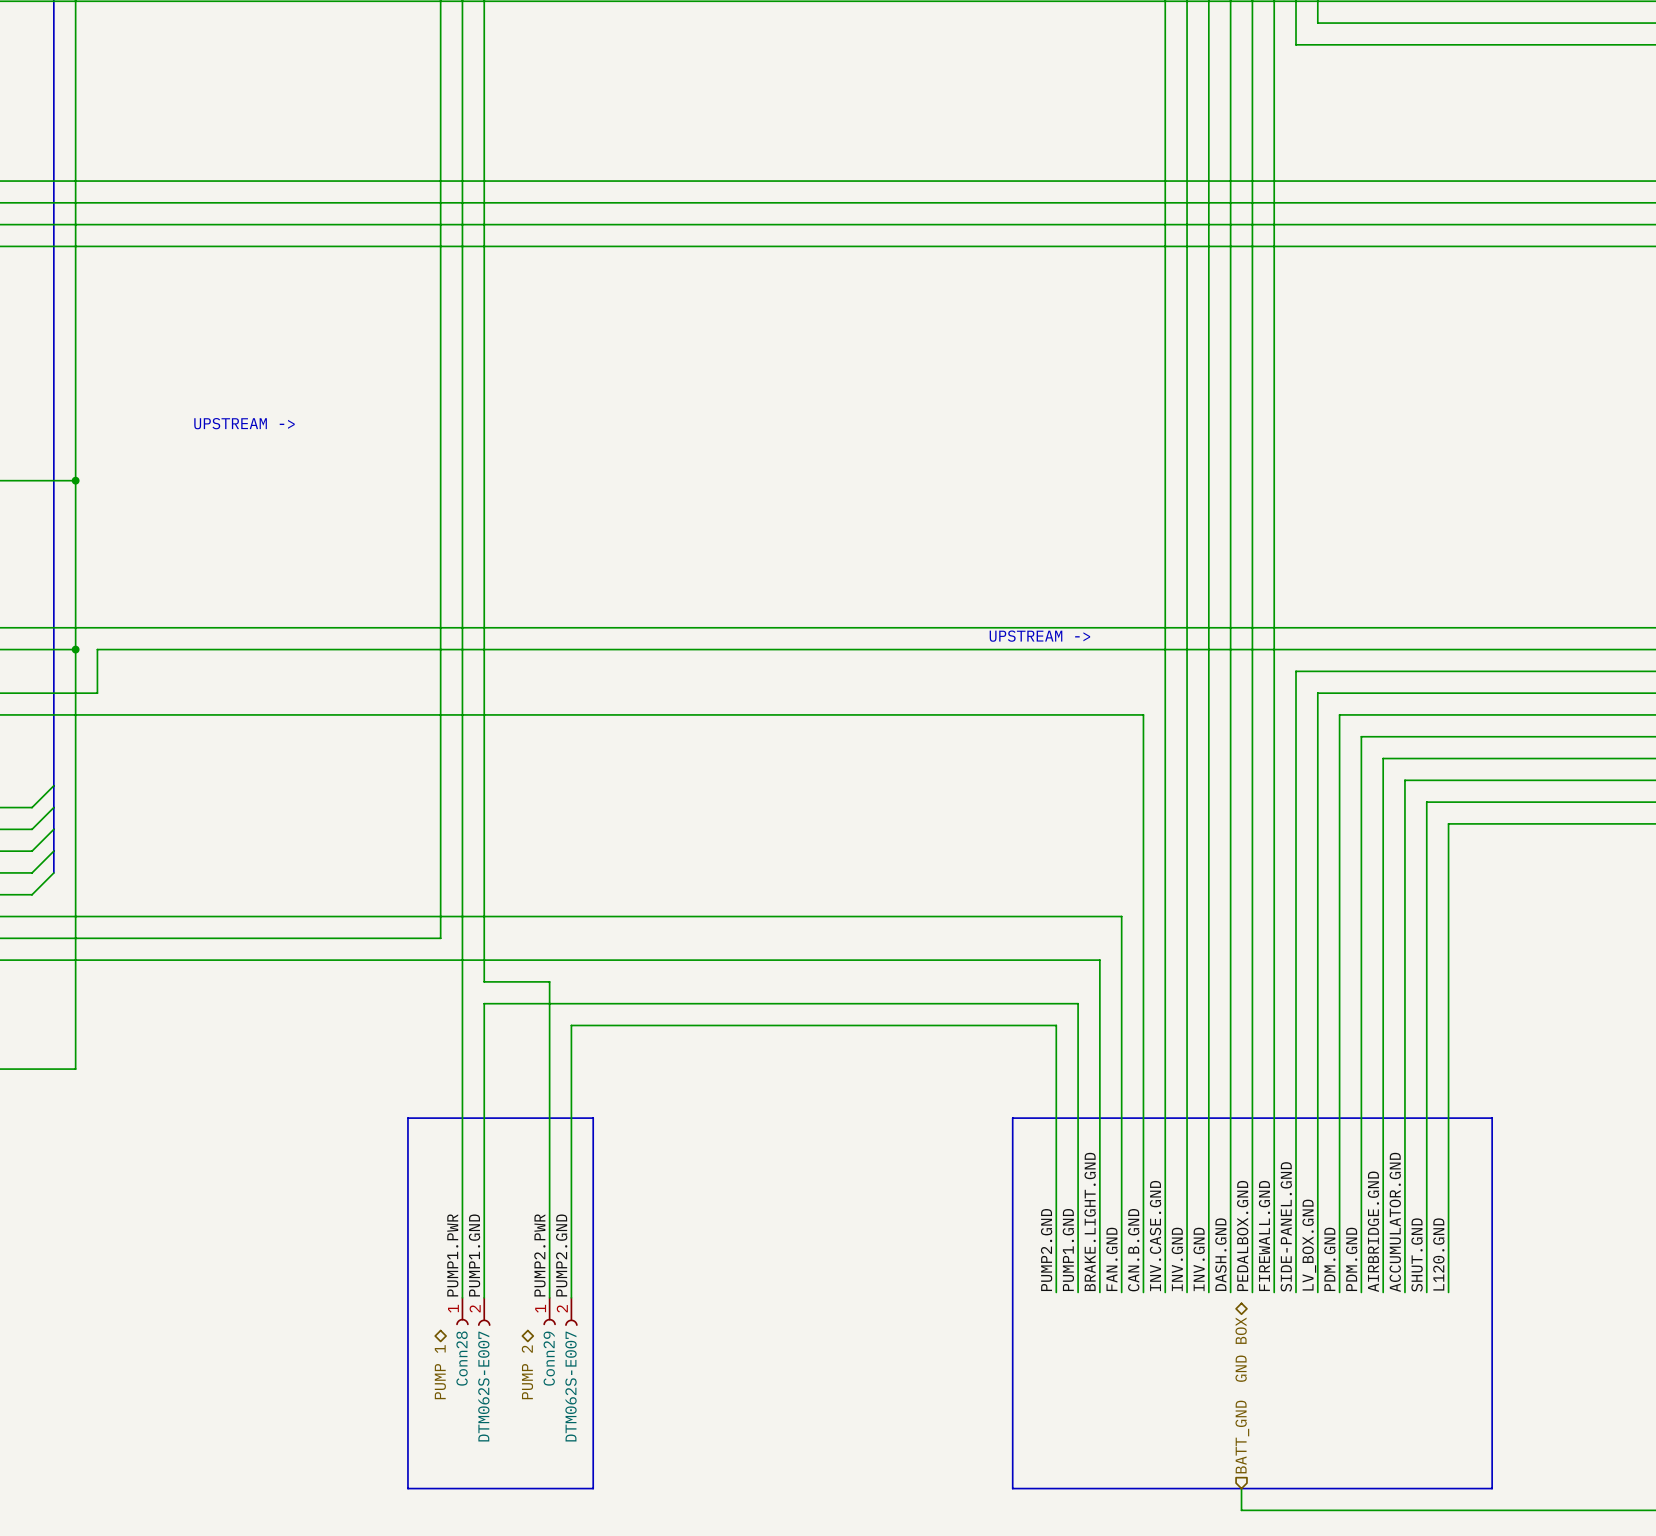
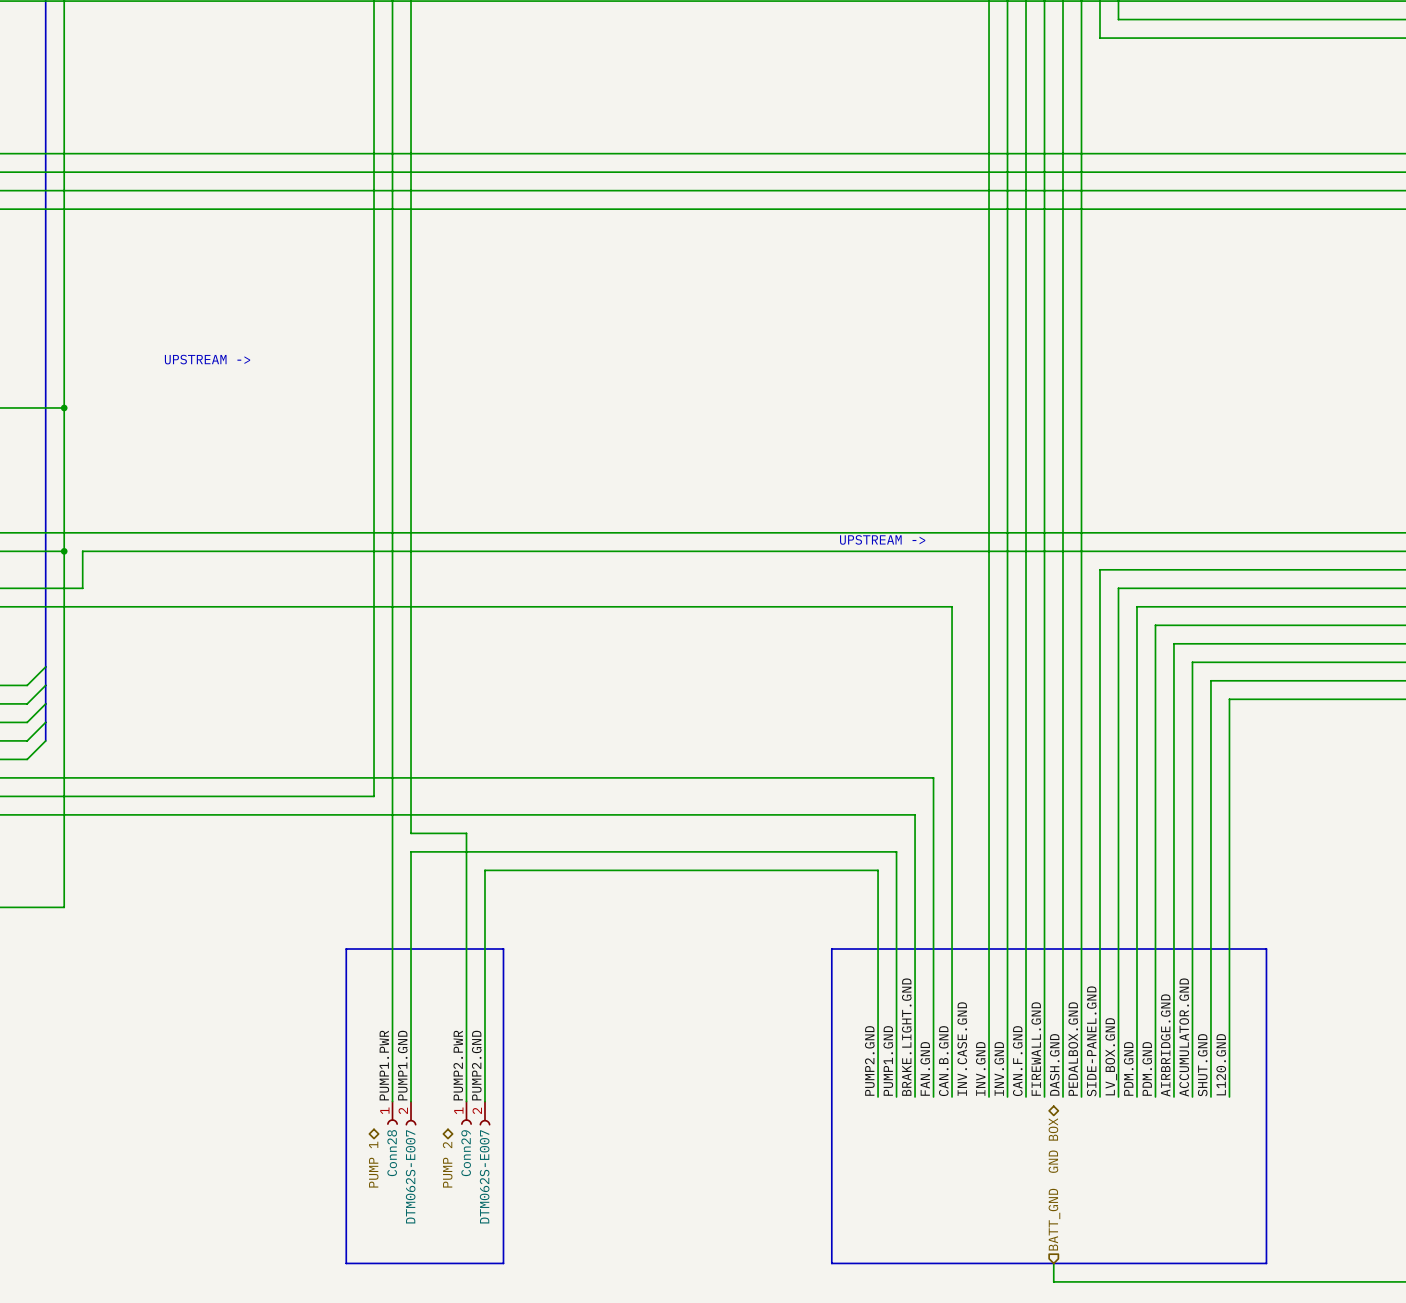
wire: (1121, 714) (1143, 714) (1143, 1292) -> (952, 606) (952, 777)
wire: (1099, 916) (1121, 916) -> (933, 777) (933, 814)
wire: (1078, 960) (1099, 960) -> (915, 814) (915, 851)
wire: (1056, 1003) (1078, 1003) -> none
wire: (1034, 1025) (1056, 1025) -> (896, 851) (896, 870)
wire: none -> (878, 870) (878, 1096)
line: (1012, 1118) (1012, 1488) -> (859, 949) (831, 949) (831, 1263) (859, 1263)
label: BRAKE.LIGHT.GND (1090, 1221) -> FAN.GND (925, 1068)
label: PEDALBOX.GND (1242, 1235) -> DASH.GND (1054, 1064)
label: FIREWALL.GND (1264, 1235) -> PEDALBOX.GND (1073, 1049)
label: INV.CASE.GND (1155, 1236) -> INV.GND (980, 1068)
label: none -> PUMP2.GND (869, 1060)
label: PUMP2.GND (1046, 1250) -> PUMP1.GND (888, 1060)
label: PUMP1.GND (1068, 1250) -> BRAKE.LIGHT.GND (906, 1037)
label: CAN.B.GND (1133, 1250) -> INV.CASE.GND (962, 1049)
label: DASH.GND (1220, 1254) -> FIREWALL.GND (1036, 1049)
label: FAN.GND (1111, 1259) -> CAN.B.GND (943, 1061)
label: INV.GND (1199, 1259) -> CAN.F.GND (1017, 1061)

